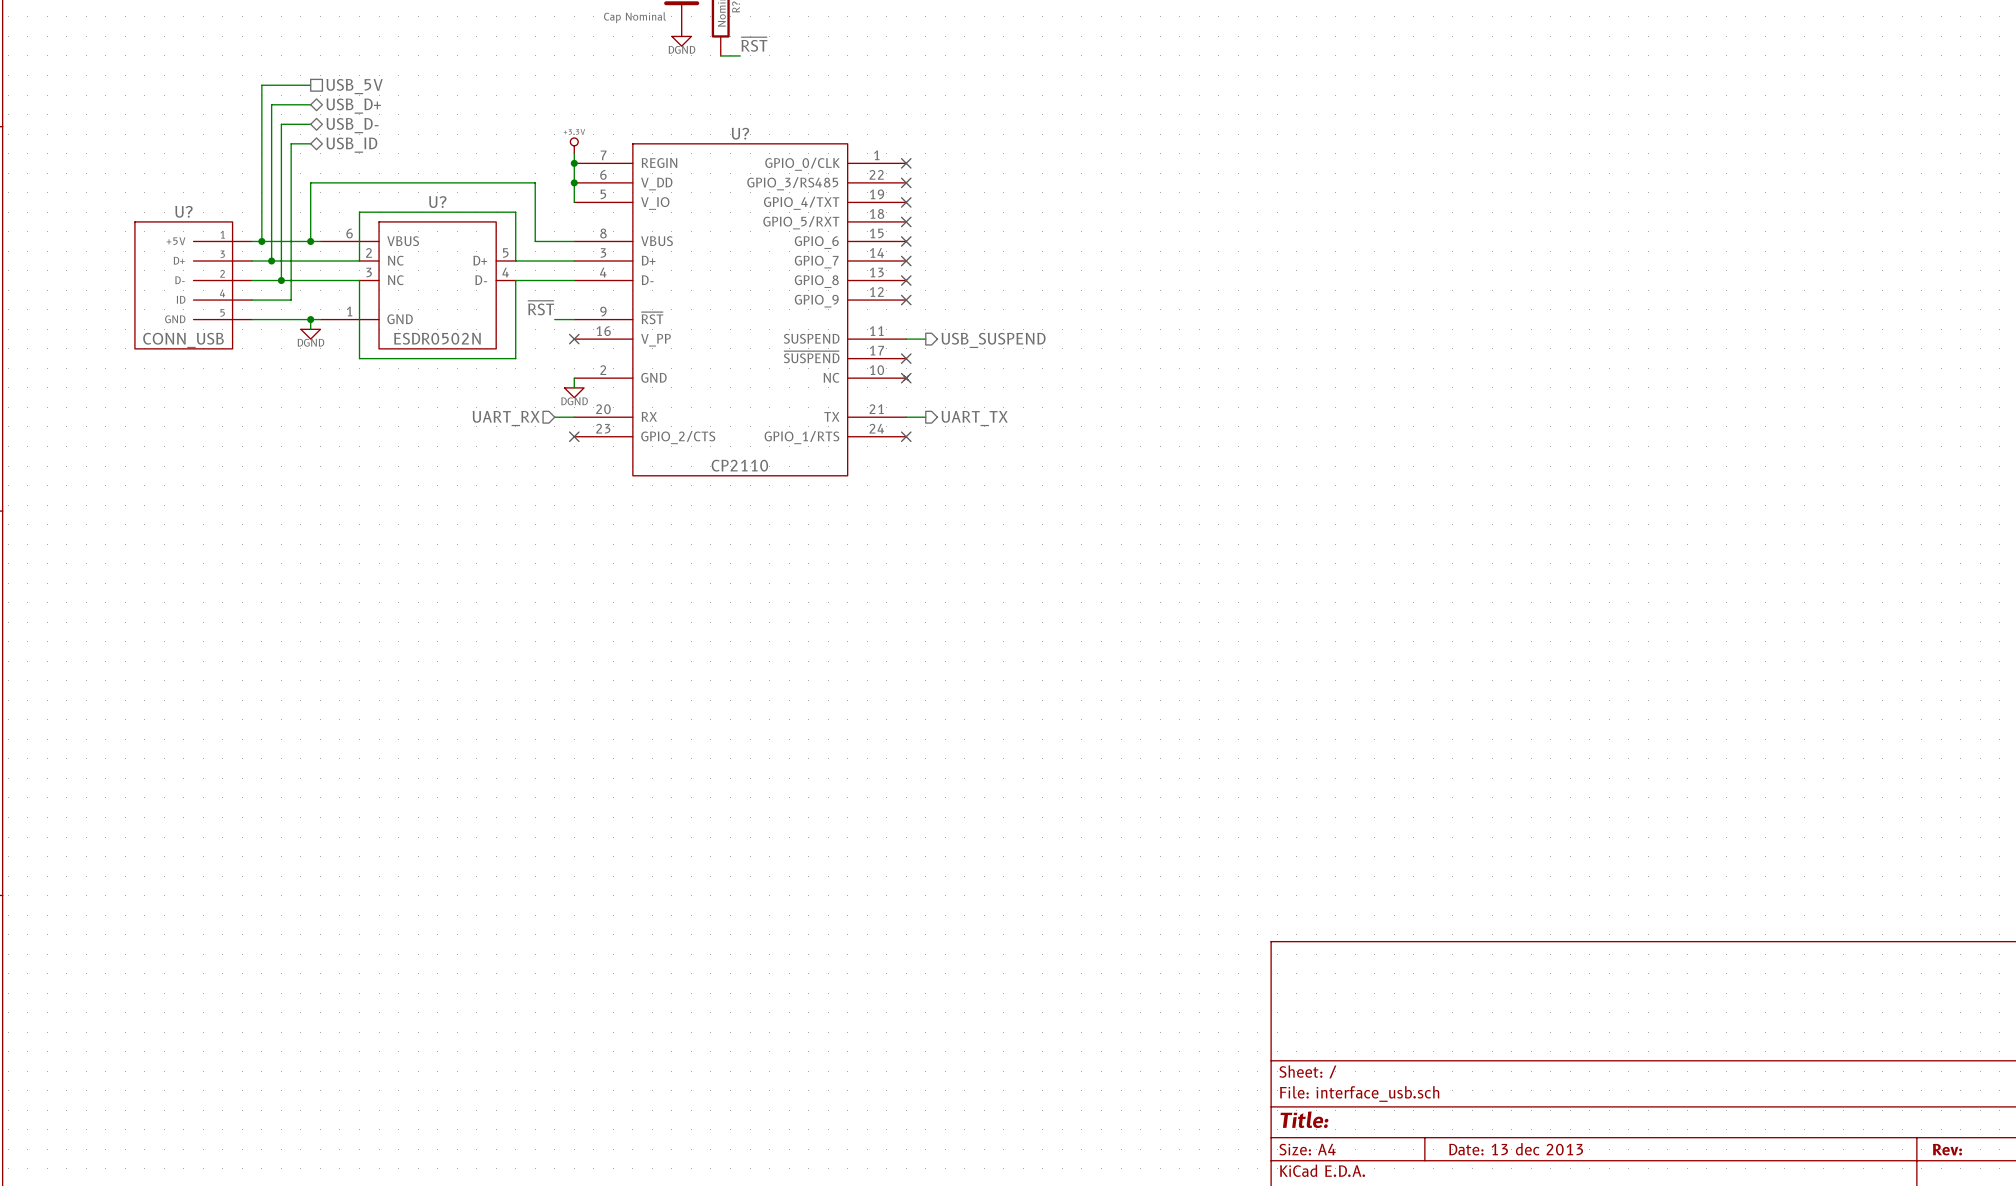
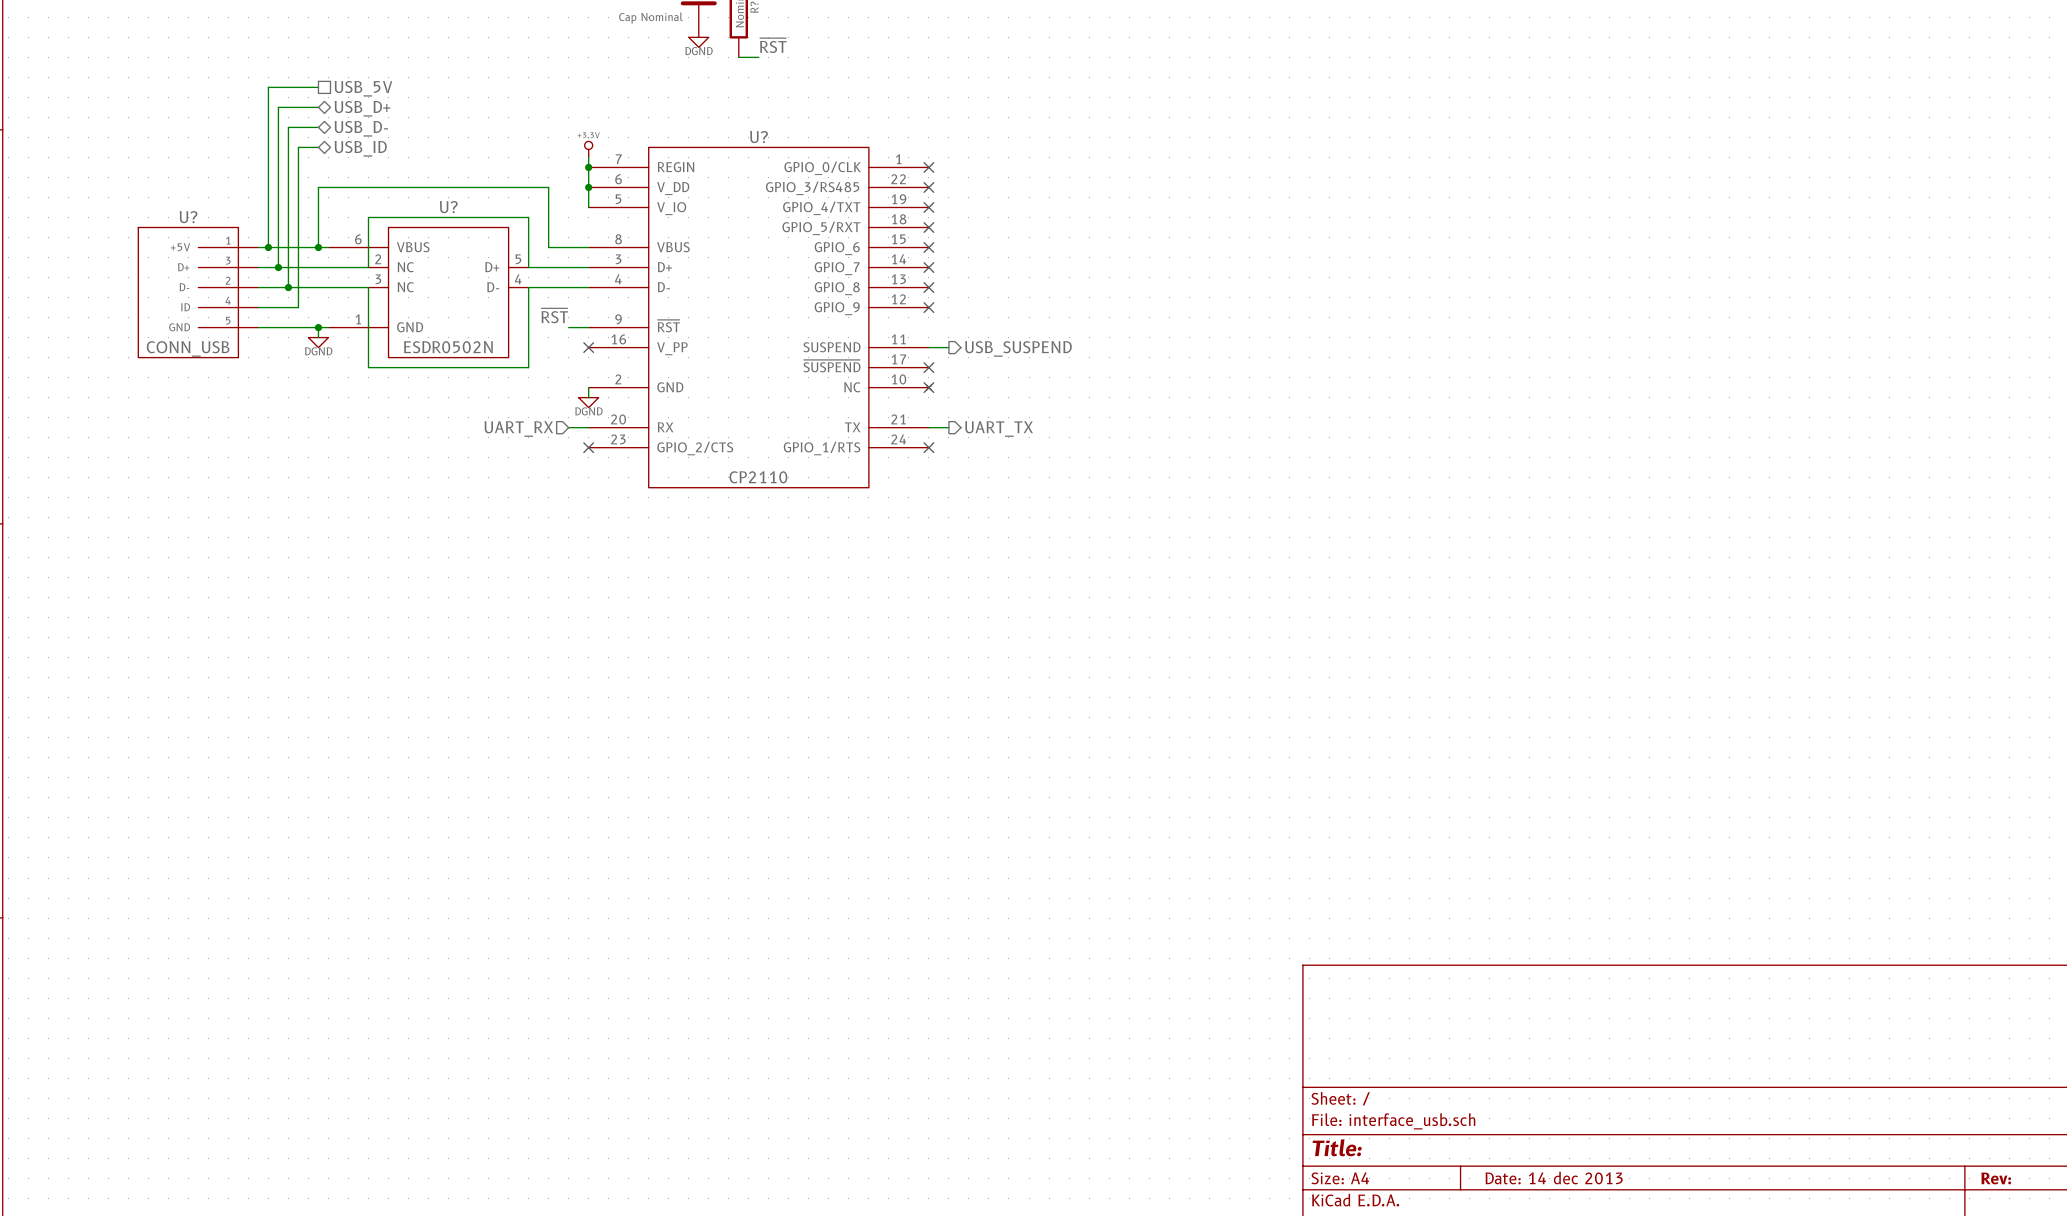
title block: Date: 13 dec 2013 (1516, 1149) -> Date: 14 dec 2013 (1554, 1178)

